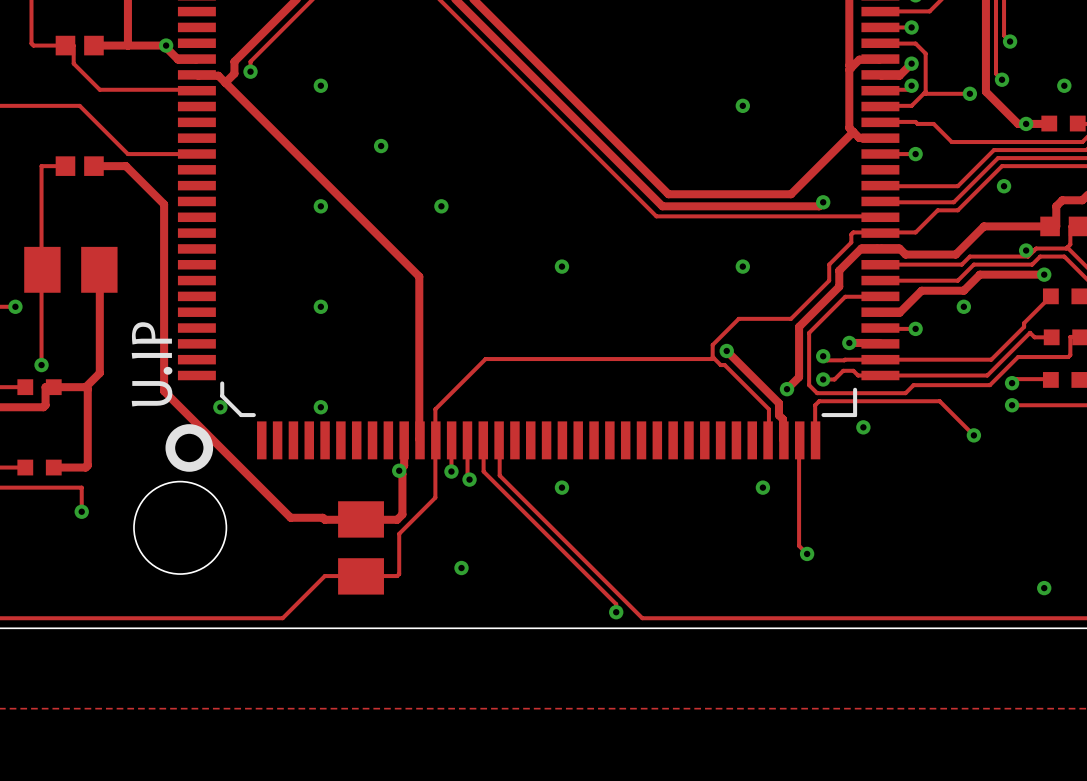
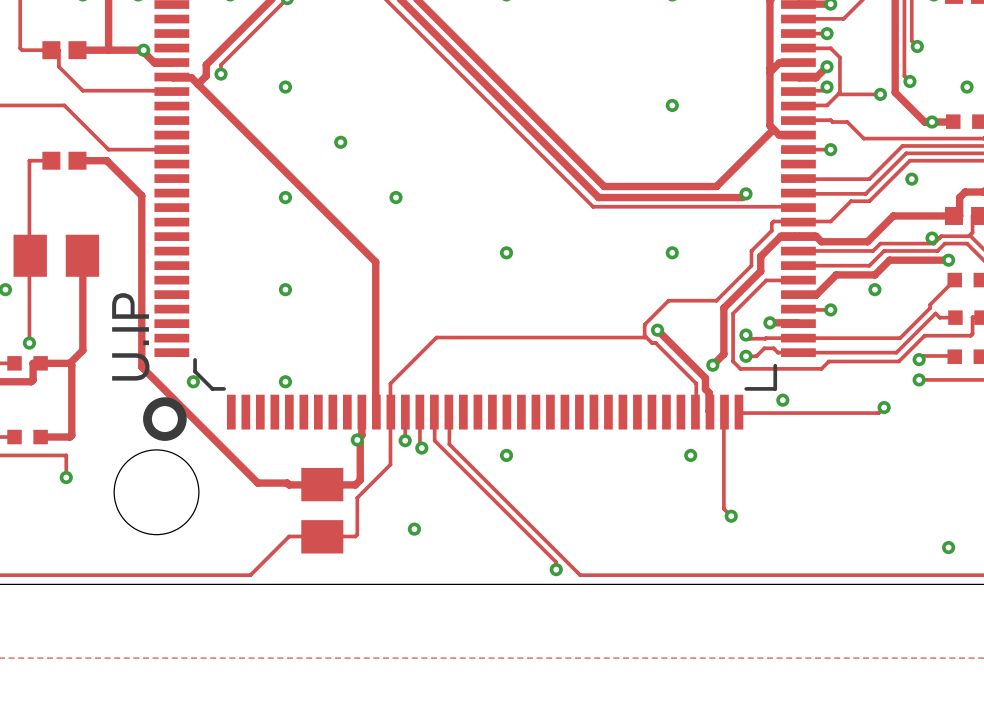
track: (973, 435) (939, 401) (819, 401) (815, 405) (815, 440) -> (884, 407) (878, 413) (738, 412)

